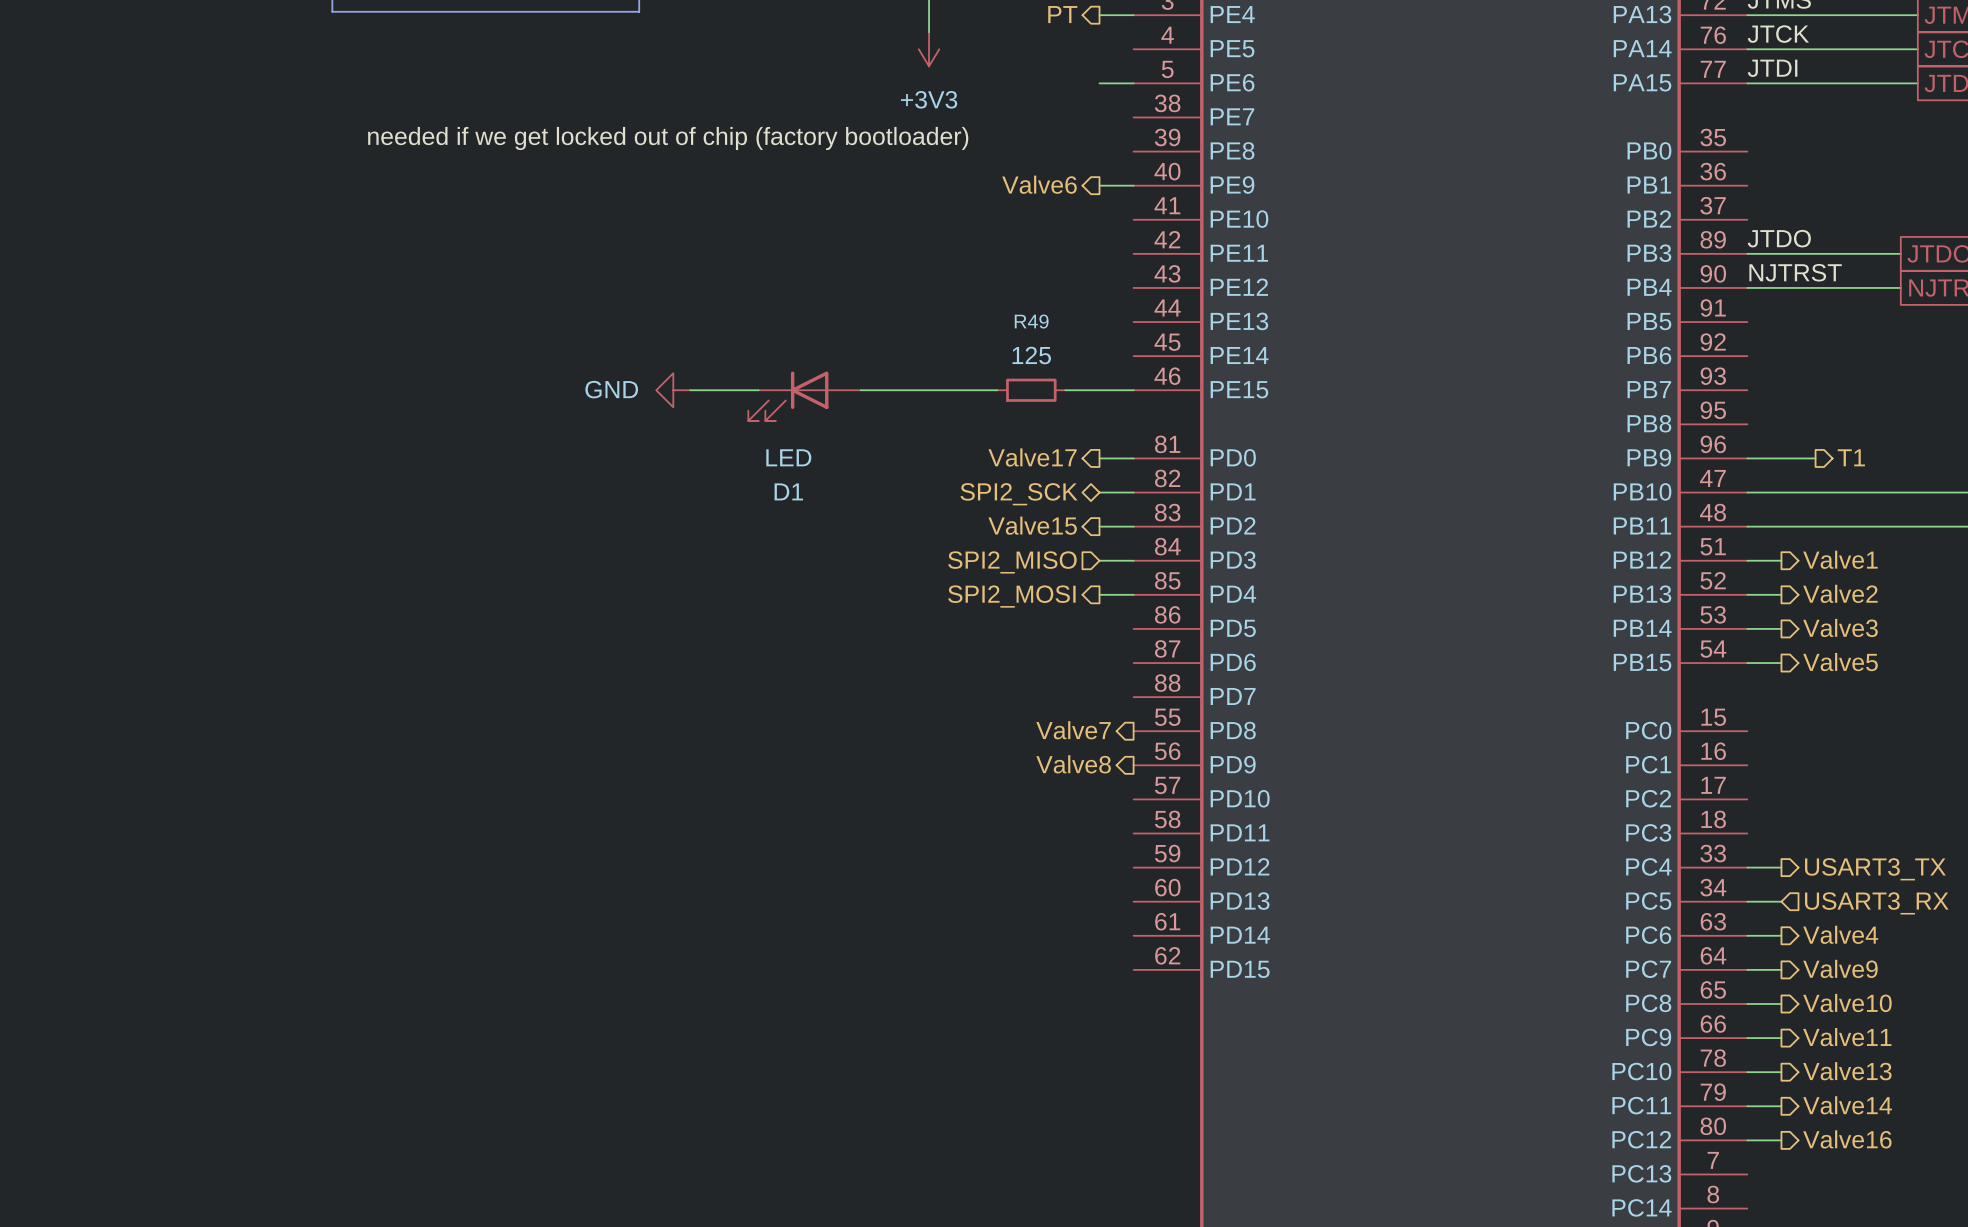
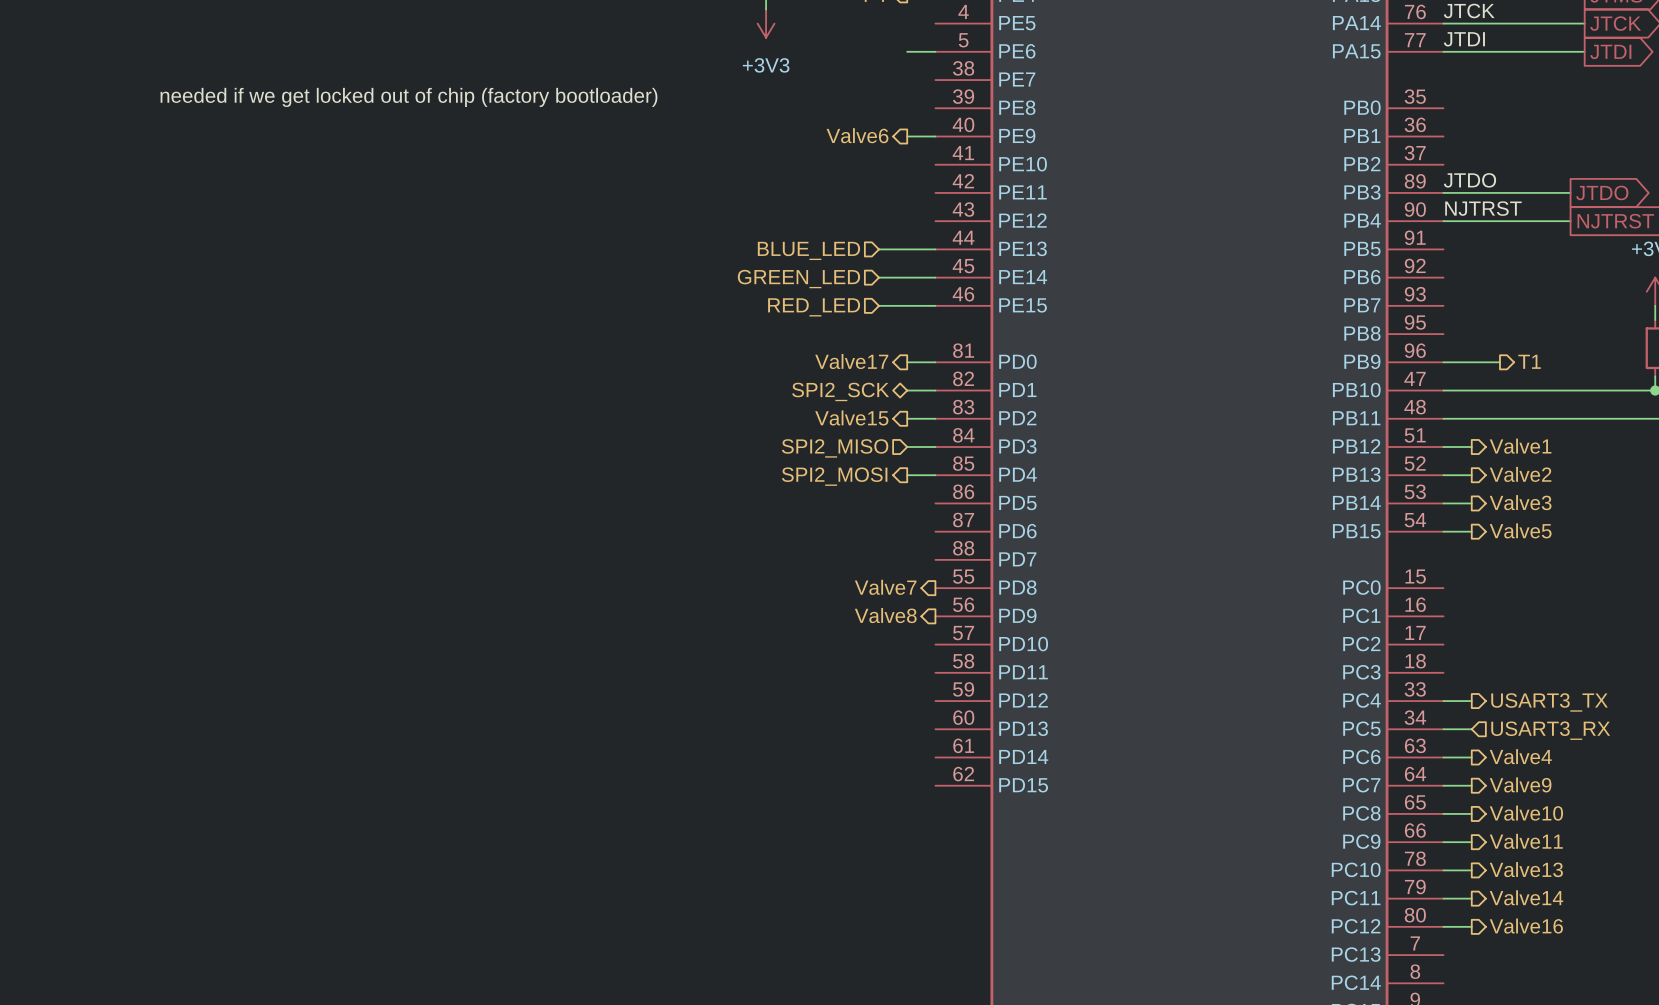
label position: needed if we get locked out of chip (factory bootloader) (668, 138) -> needed if we get locked out of chip (factory bootloader) (408, 97)
wire: none -> (878, 249) (935, 249)
hierarchical label: none -> BLUE_LED (808, 250)
wire: none -> (878, 277) (935, 277)
hierarchical label: none -> GREEN_LED (798, 279)
power symbol: GND (673, 390) -> none
wire: (690, 390) (758, 390) -> none
wire: (860, 390) (997, 390) -> none
R49: 125 (1031, 390) -> none
hierarchical label: none -> RED_LED (814, 307)
D1: LED (804, 396) -> none

